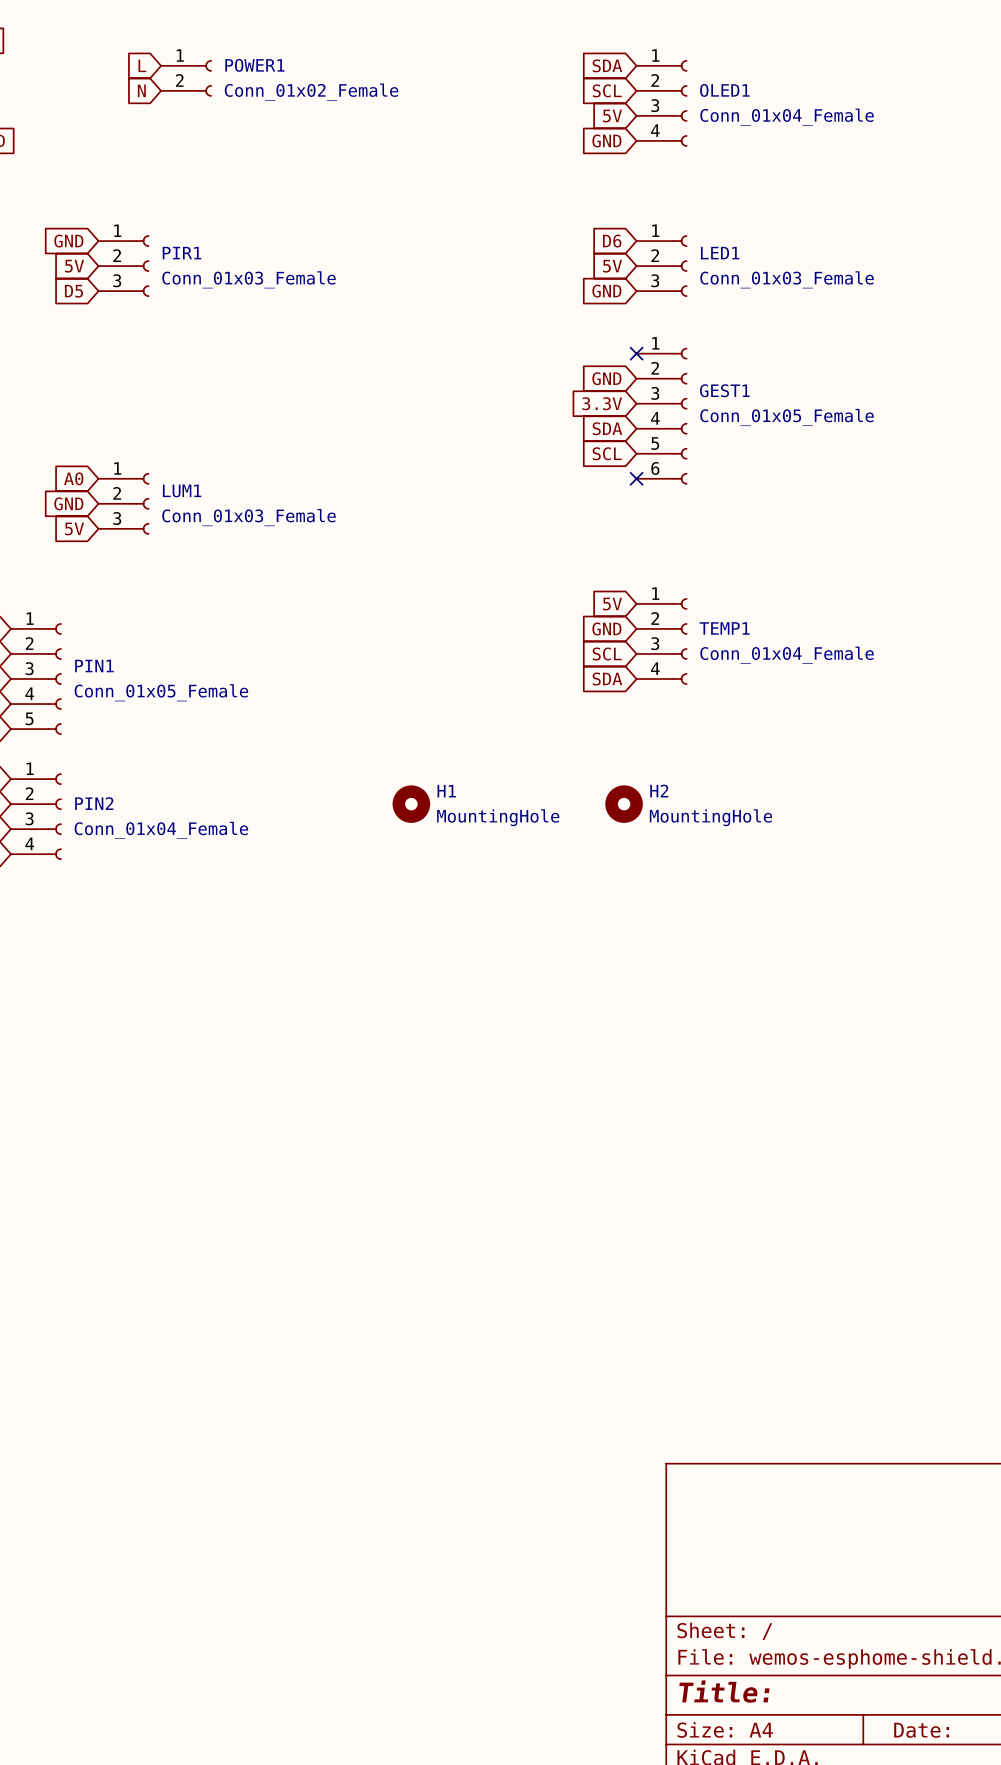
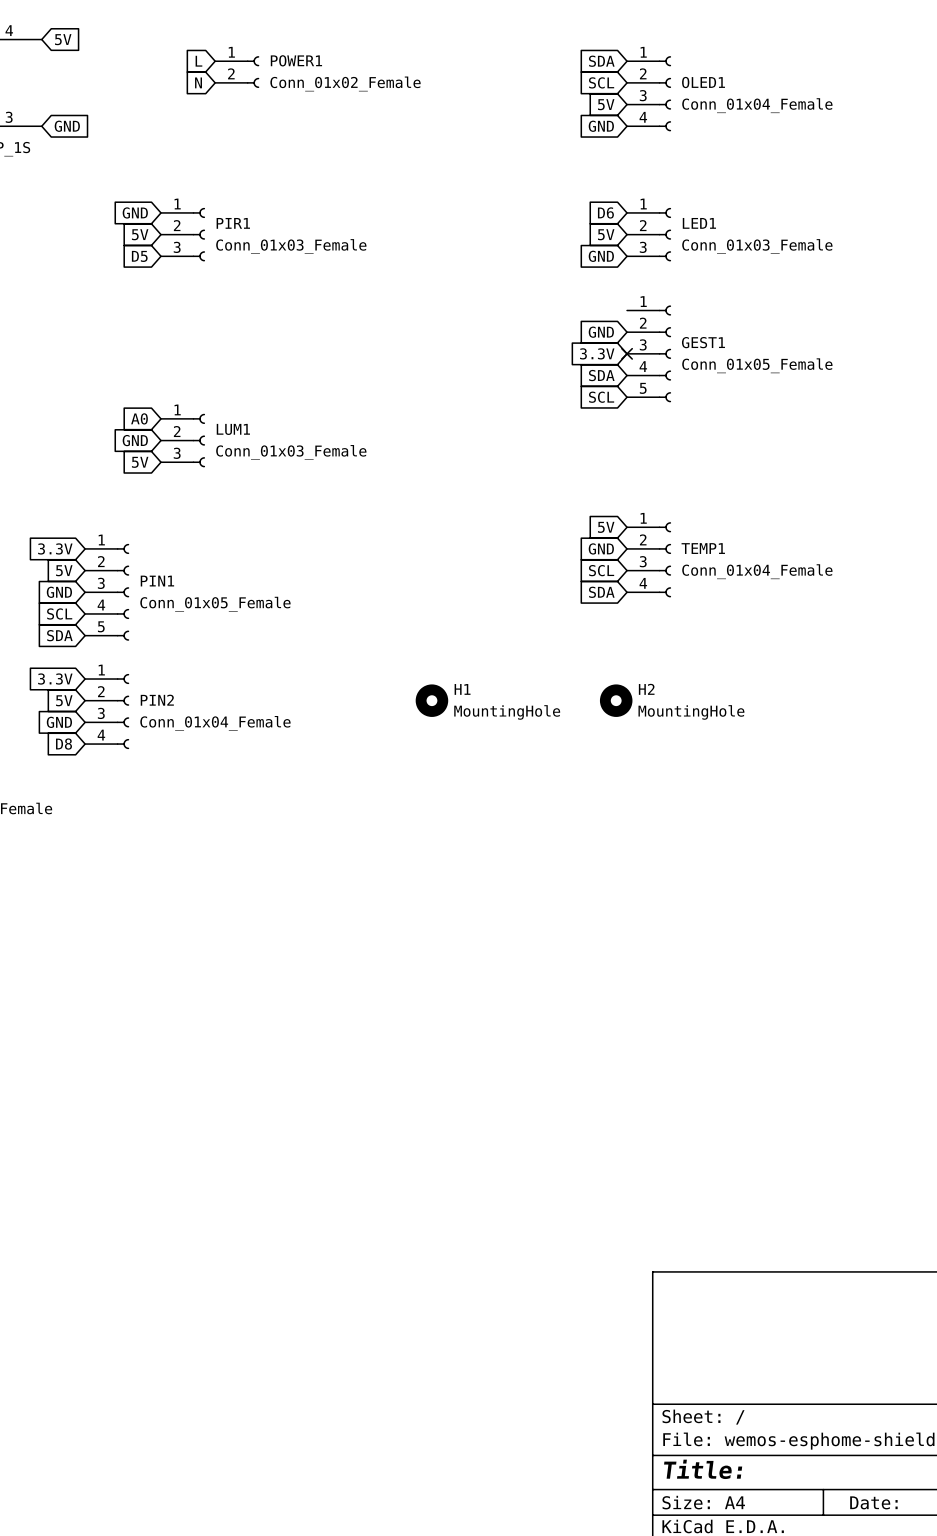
GEST1 symbol: [636, 347, 688, 485] -> [627, 305, 672, 403]
no-connect mark: (636, 353) -> none
no-connect mark: none -> (627, 353)
no-connect mark: (636, 478) -> none

